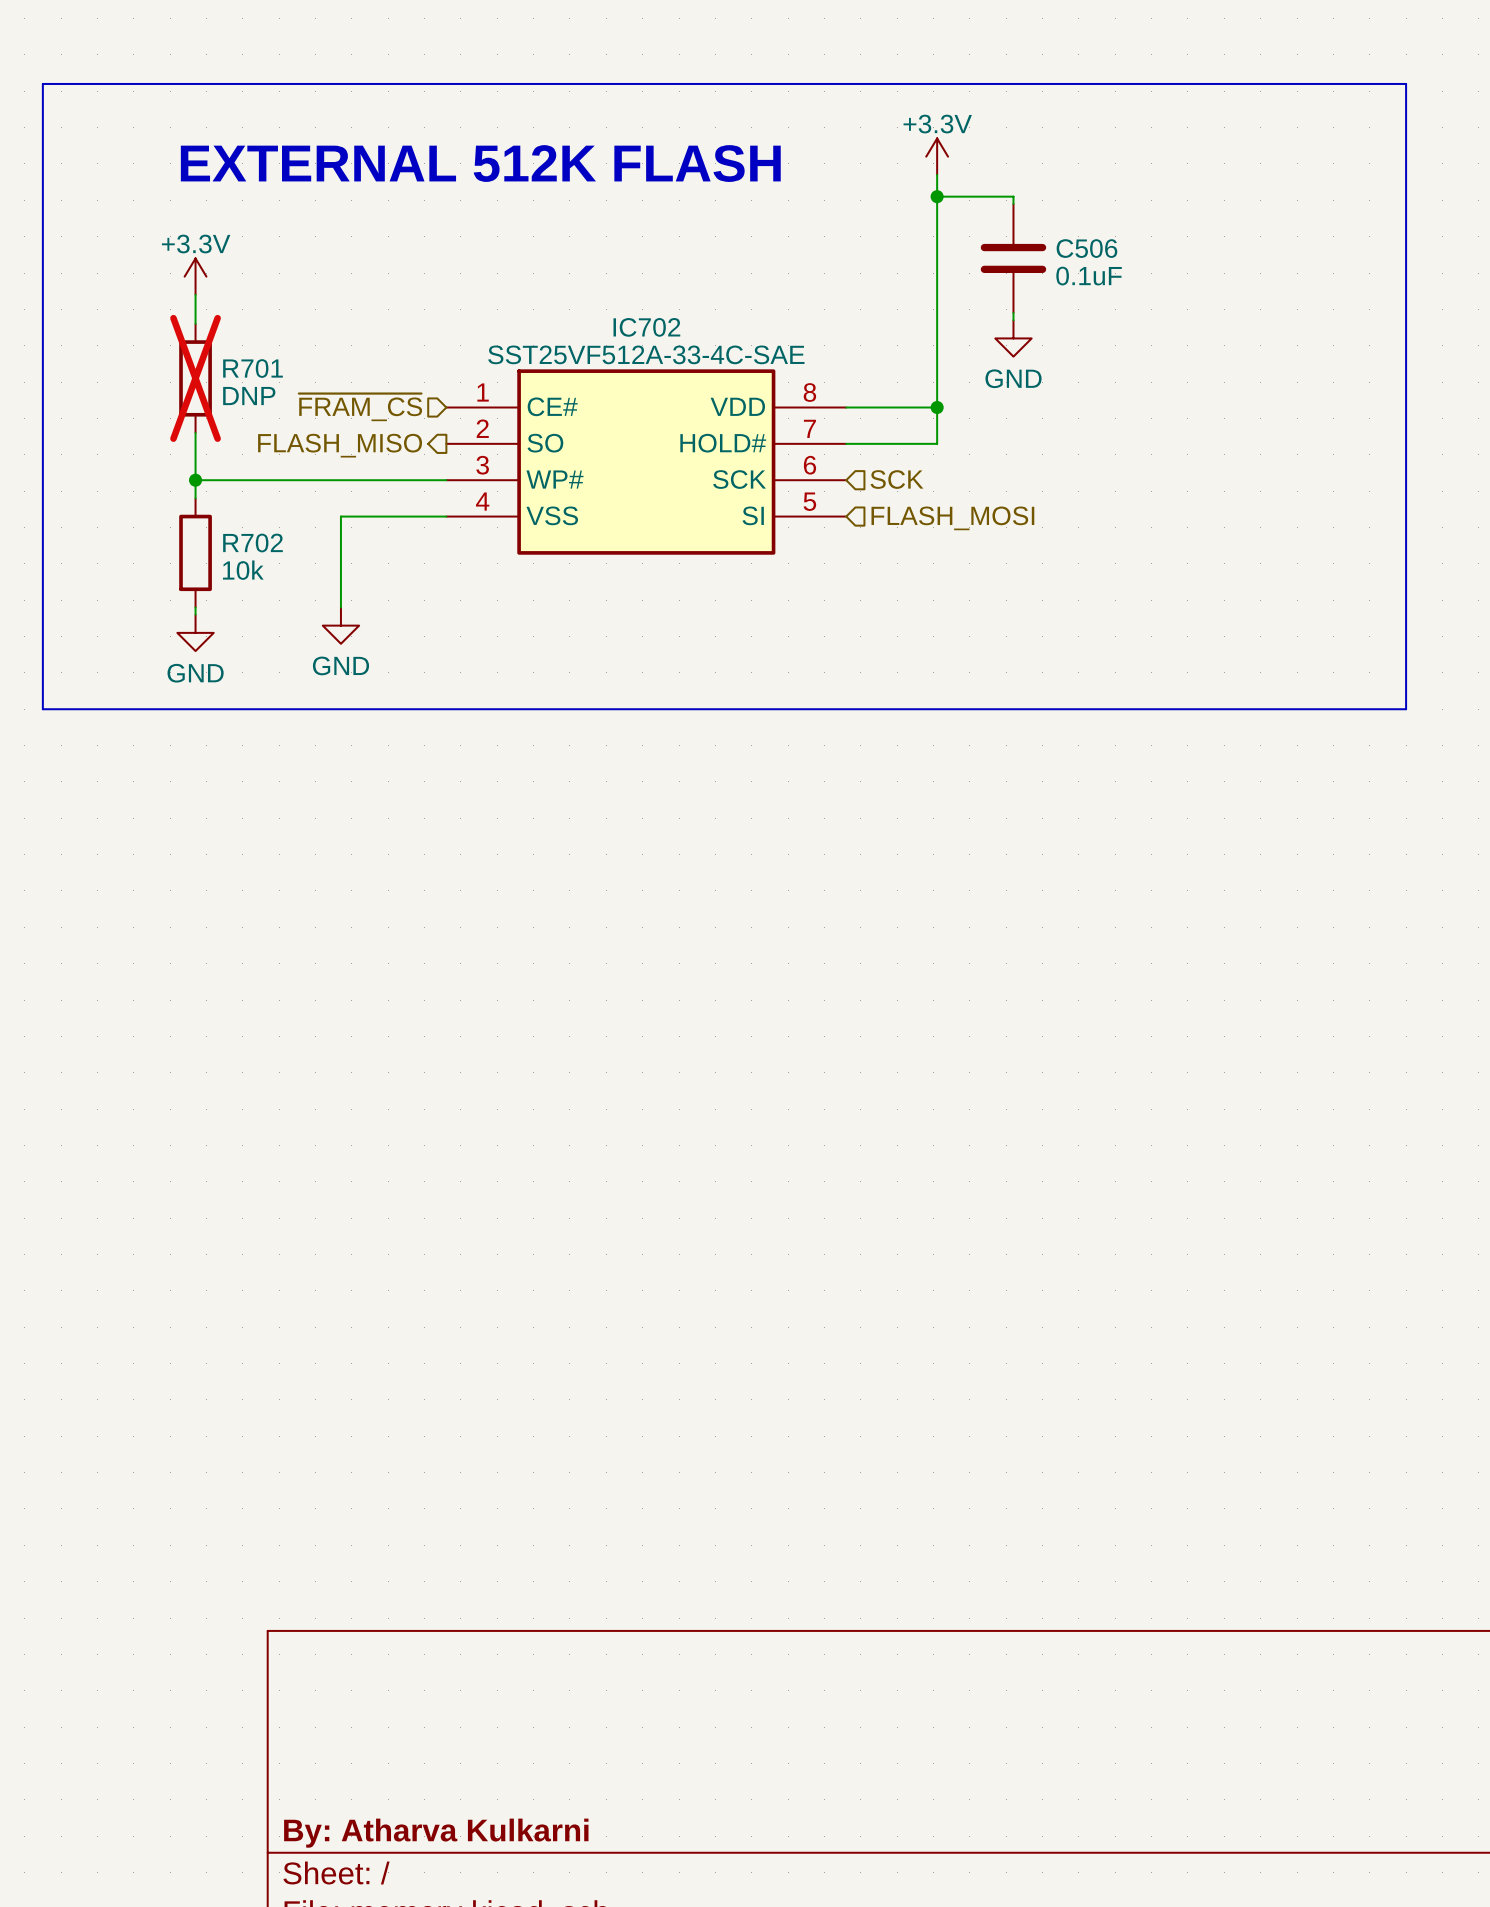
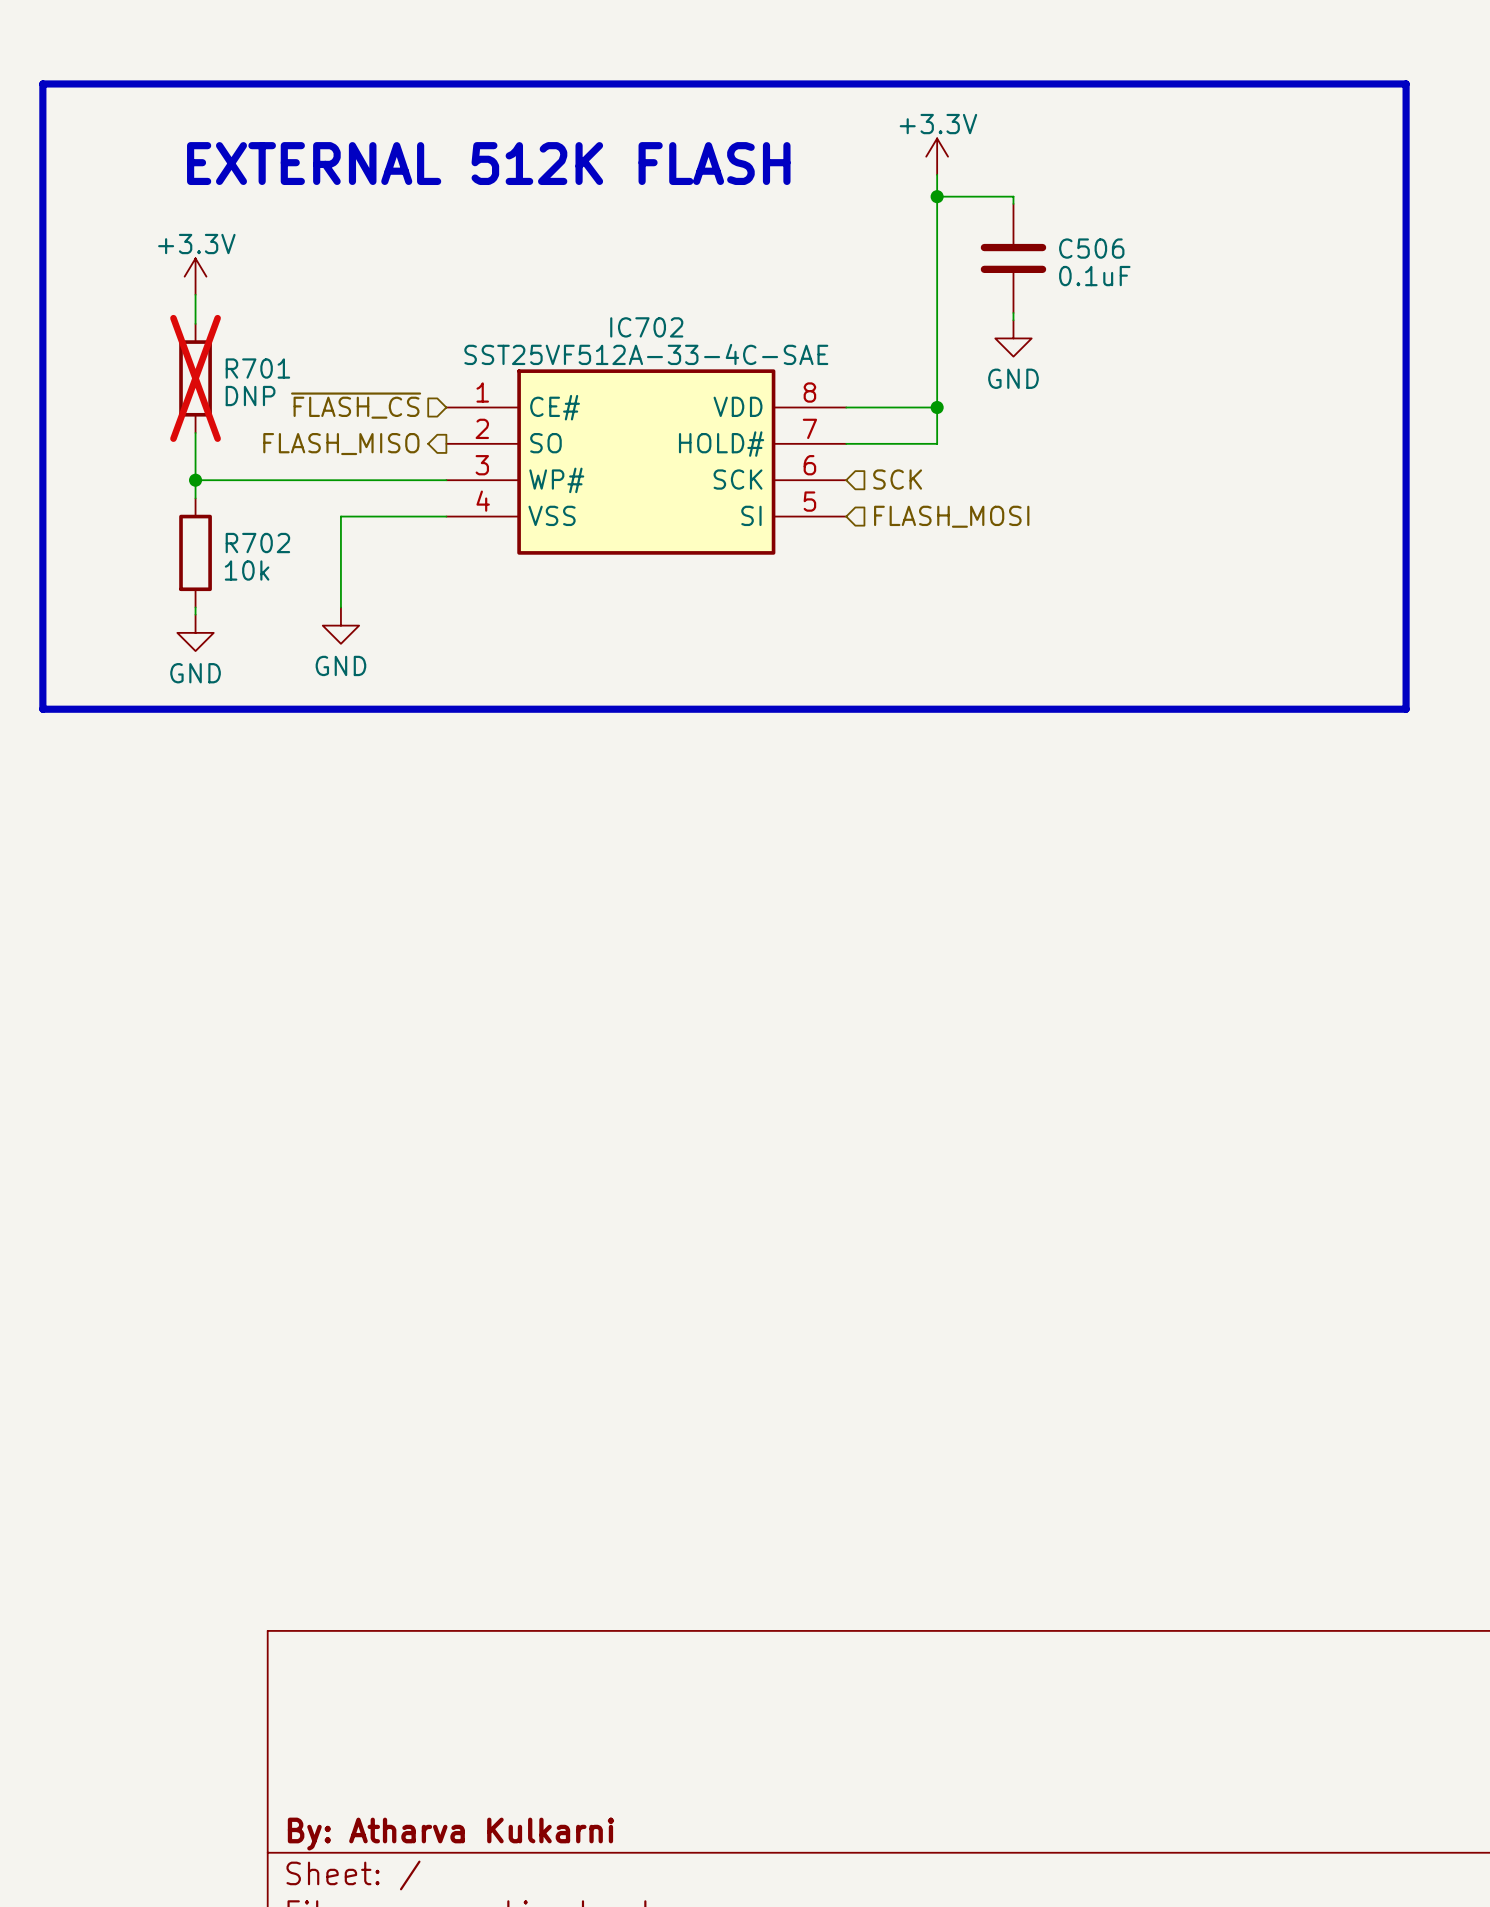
line width: thin (42, 83) (1406, 83) (1406, 709) (42, 709) (42, 83) -> thick (42, 83) (1406, 83) (1406, 709) (42, 709) (42, 83)
hierarchical label: ~{FRAM_CS} (360, 407) -> ~{FLASH_CS} (356, 405)

